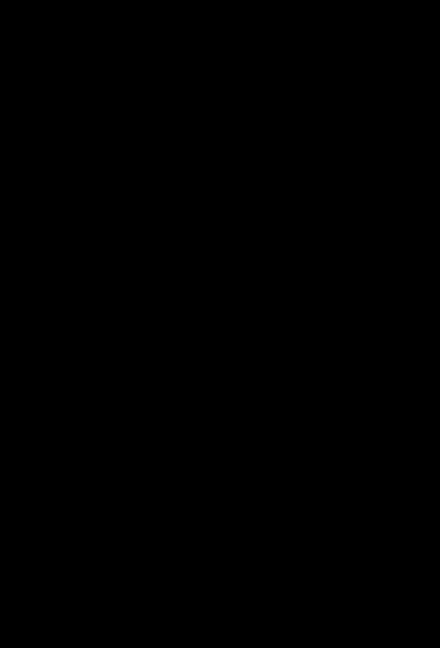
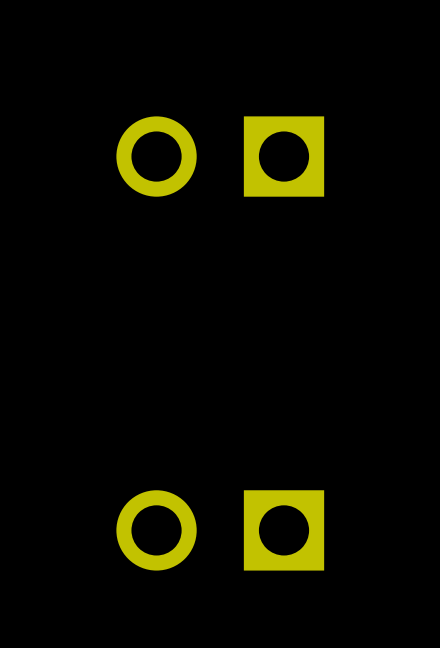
part: none -> (220, 156)
part: none -> (220, 530)

